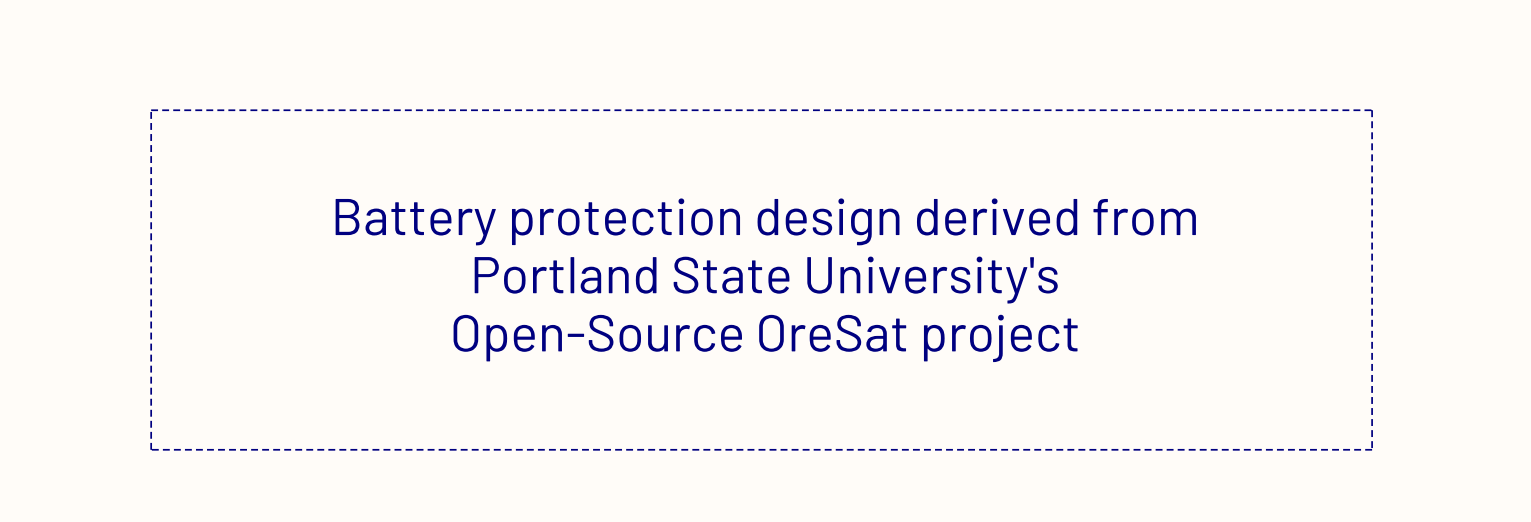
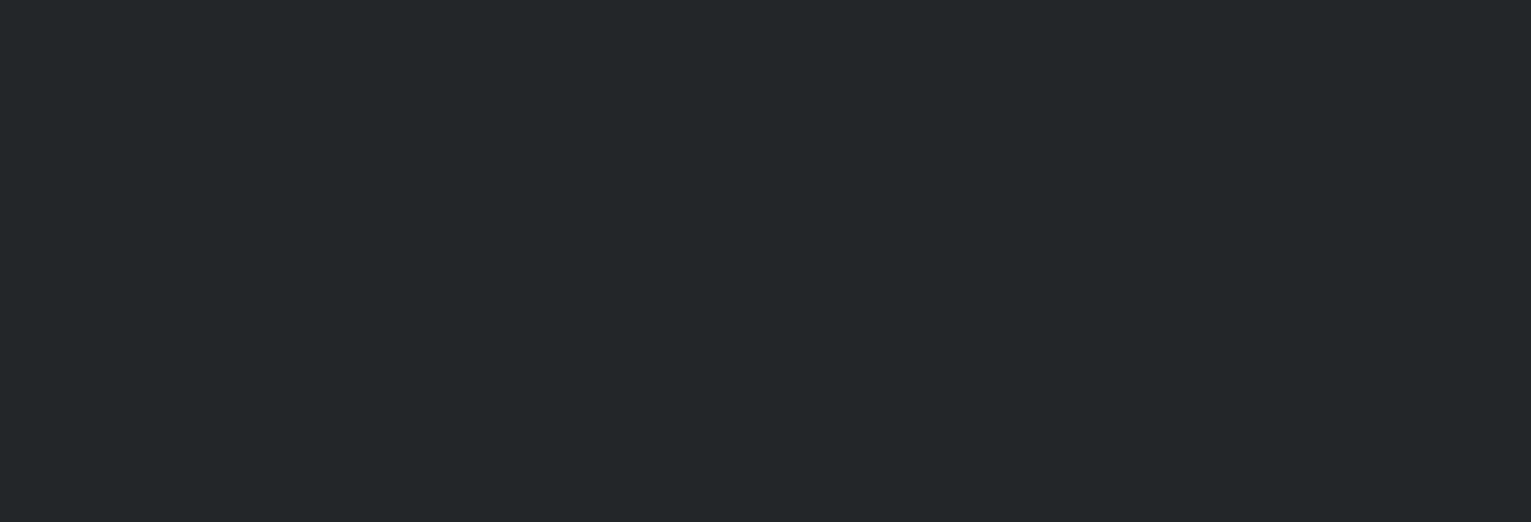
line: (151, 110) (1372, 110) (1372, 449) (151, 449) (151, 110) -> none
text: Battery protection design derived from (765, 221) -> none
text: Portland State University's (766, 280) -> none
text: Open-Source OreSat project (765, 338) -> none

